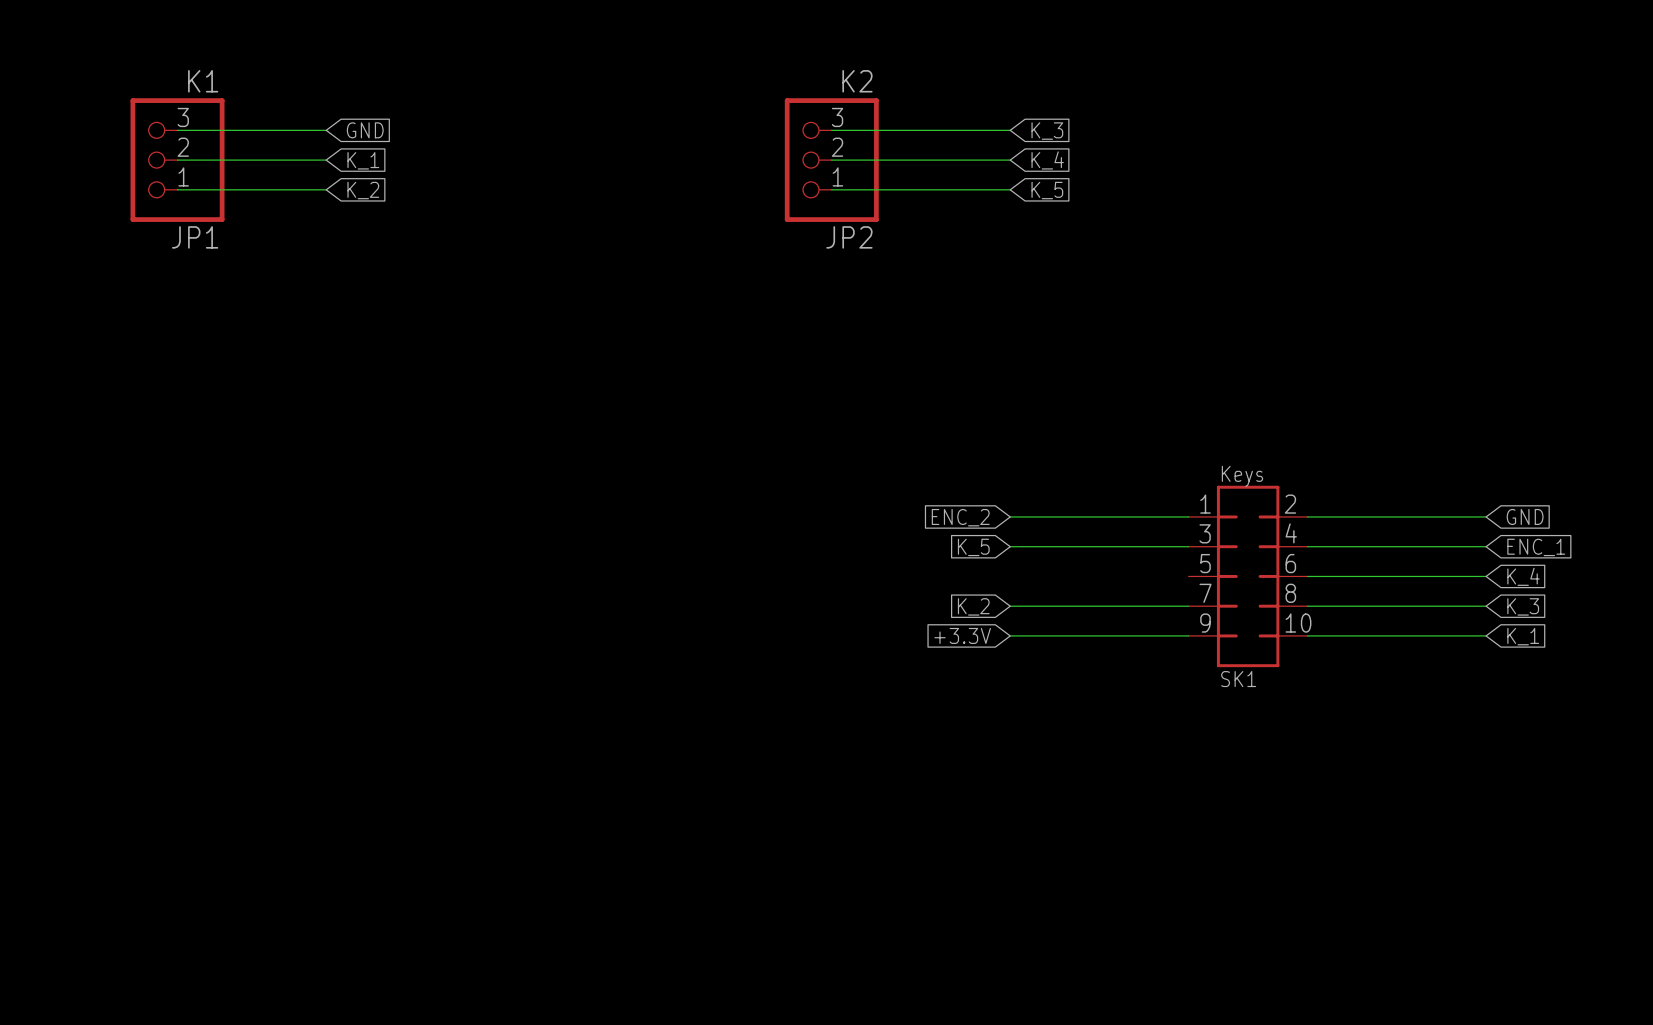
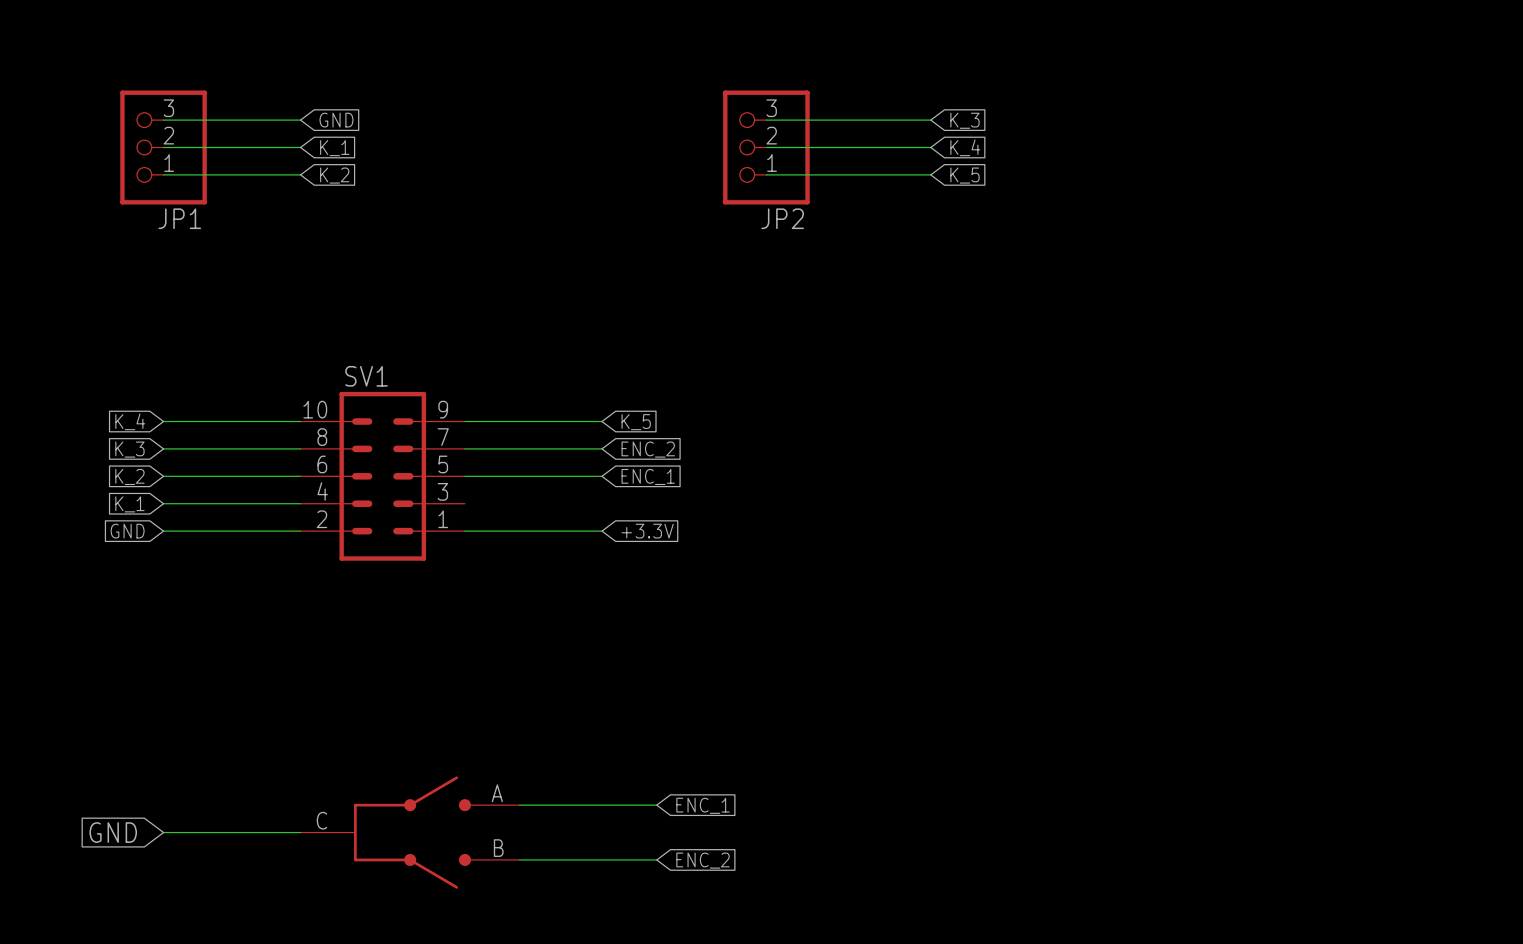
JP1 value: K1 (203, 81) -> none
JP2 value: K2 (857, 81) -> none
global label: none -> K_4 (130, 421)
wire: none -> (163, 421) (300, 421)
wire: none -> (464, 421) (601, 421)
global label: none -> K_5 (636, 422)
global label: none -> K_3 (129, 449)
wire: none -> (163, 448) (300, 448)
wire: none -> (464, 448) (601, 448)
global label: none -> ENC_2 (648, 449)
wire: none -> (163, 476) (300, 476)
SV1: none -> (382, 476)
wire: none -> (464, 476) (601, 476)
wire: (1010, 516) (1188, 516) -> none
wire: (1307, 516) (1486, 516) -> none
global label: GND (1525, 516) -> none
global label: none -> K_2 (129, 476)
global label: none -> ENC_1 (648, 476)
global label: ENC_2 (960, 517) -> none
wire: none -> (163, 503) (300, 503)
wire: (1010, 546) (1188, 546) -> none
wire: (1307, 546) (1486, 546) -> none
global label: none -> K_1 (129, 504)
global label: K_5 (973, 547) -> none
global label: ENC_1 (1536, 547) -> none
global label: none -> GND (127, 531)
wire: none -> (163, 531) (300, 531)
wire: none -> (464, 531) (601, 531)
global label: none -> +3.3V (647, 531)
SK1: Keys (1248, 576) -> none
wire: (1307, 576) (1486, 576) -> none
global label: K_4 (1523, 576) -> none
global label: K_2 (973, 606) -> none
wire: (1010, 606) (1188, 606) -> none
wire: (1307, 606) (1486, 606) -> none
global label: K_3 (1523, 606) -> none
global label: +3.3V (962, 635) -> none
wire: (1010, 635) (1188, 635) -> none
wire: (1307, 635) (1486, 635) -> none
global label: K_1 (1523, 636) -> none
wire: none -> (519, 805) (656, 805)
global label: none -> ENC_1 (703, 805)
global label: none -> GND (113, 832)
wire: none -> (163, 832) (300, 832)
part: none -> (410, 832)
wire: none -> (519, 859) (656, 859)
global label: none -> ENC_2 (703, 860)

